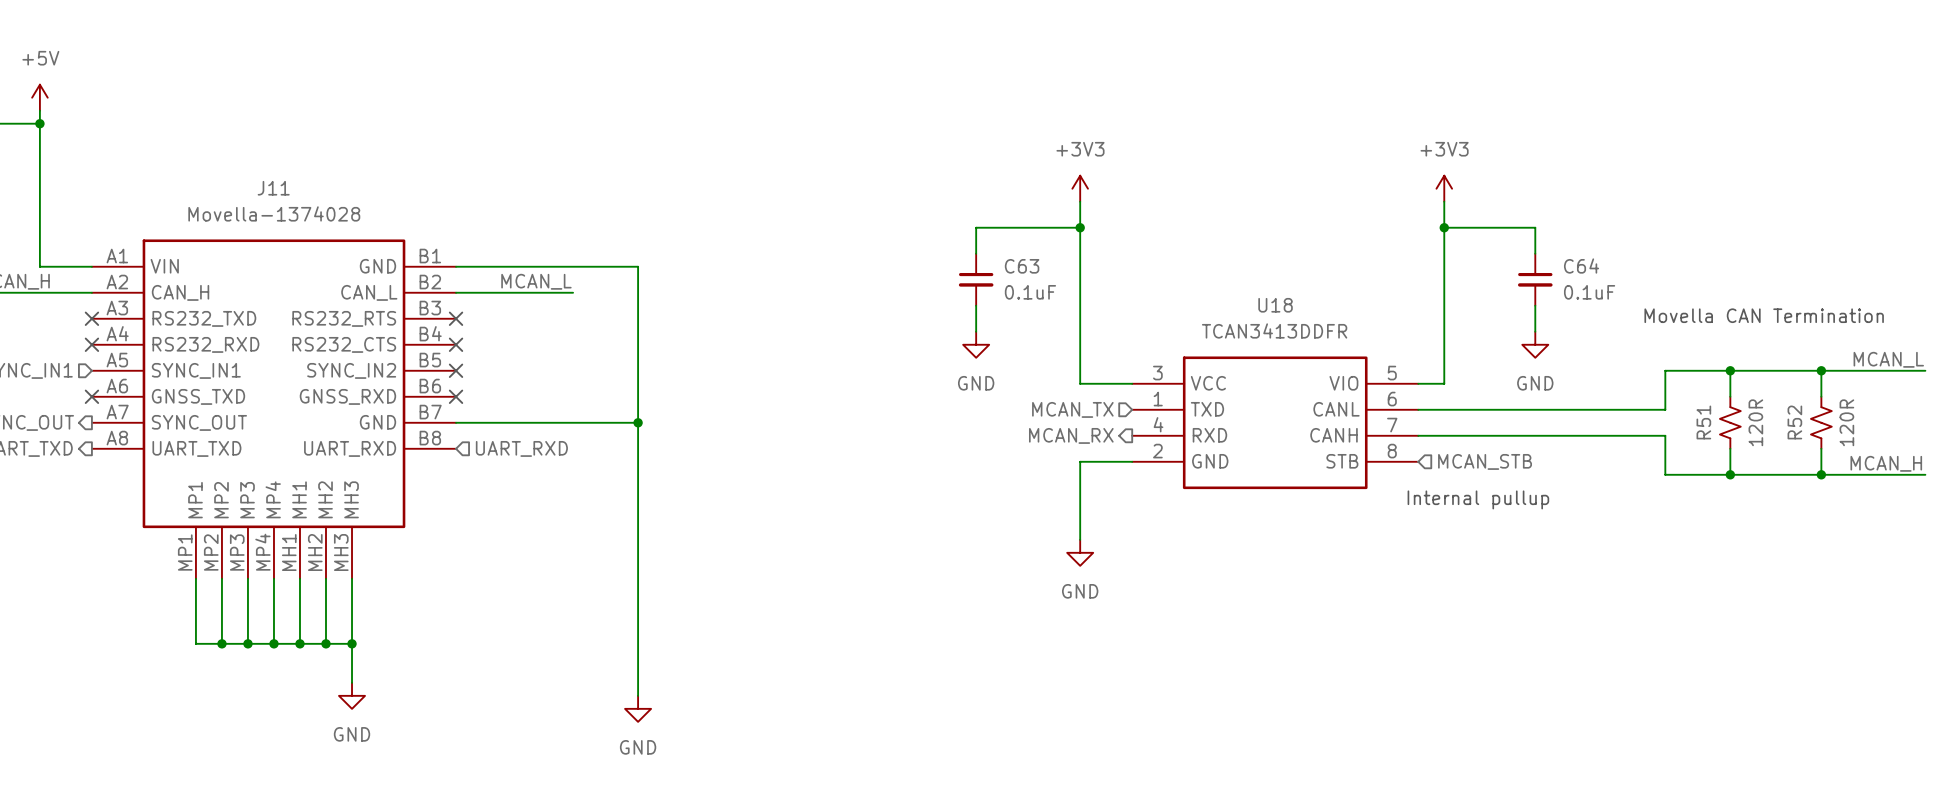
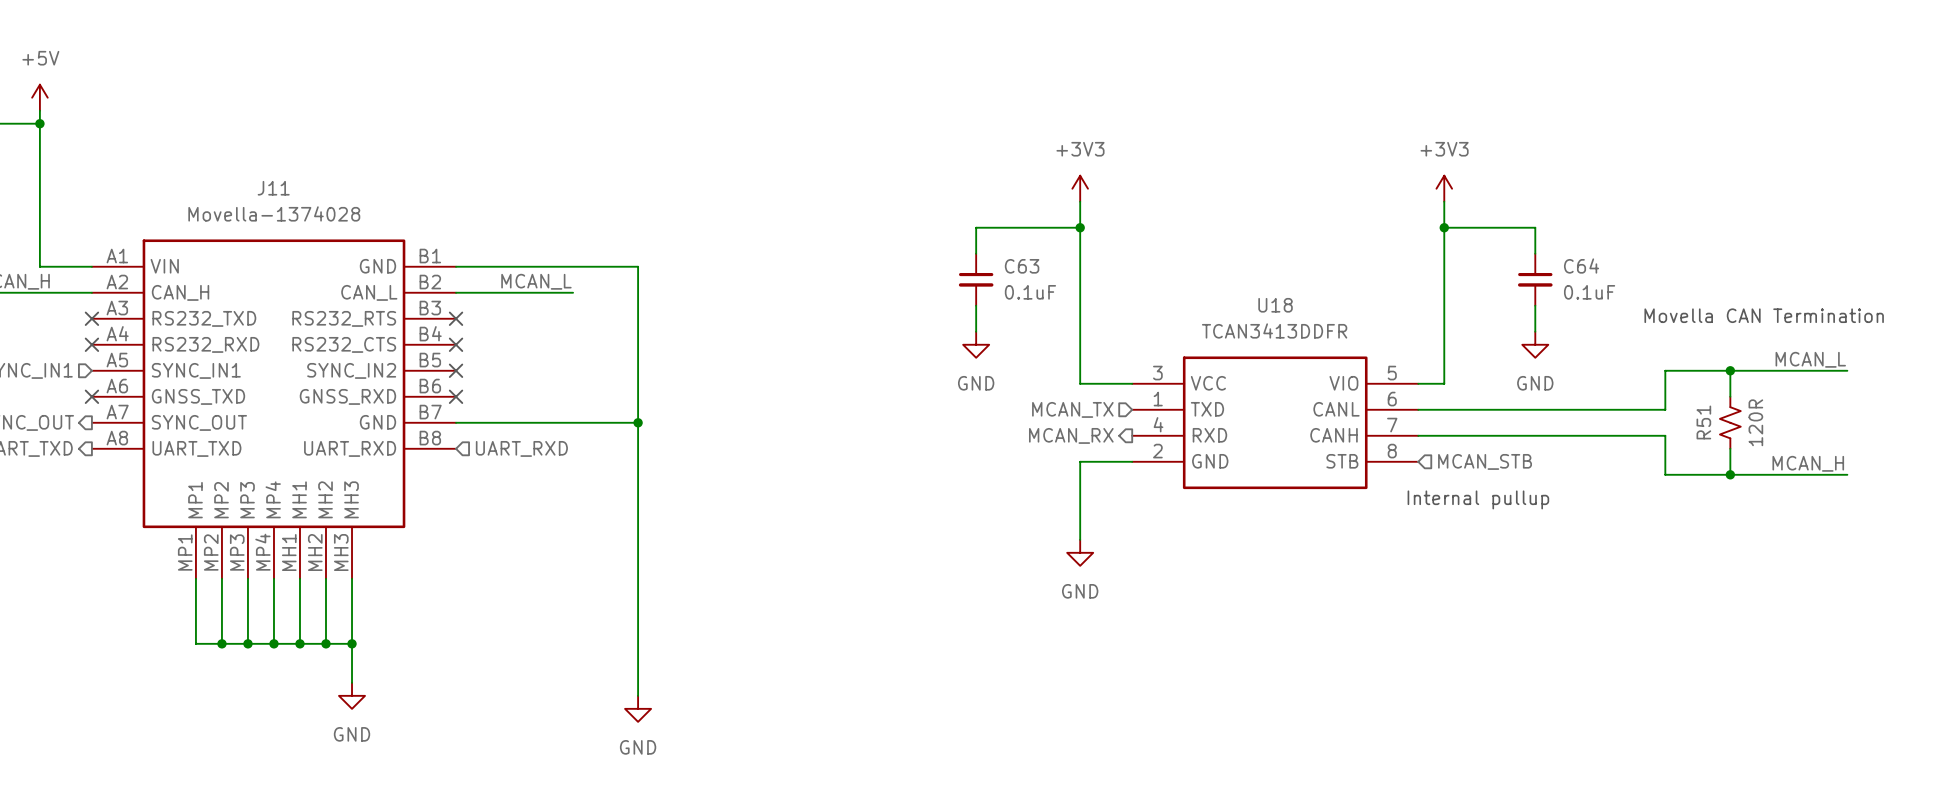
label position: MCAN_L (1888, 359) -> MCAN_L (1810, 359)
wire: (1821, 370) (1821, 396) -> none
junction: (1821, 370) -> none
wire: (1847, 370) (1925, 370) -> none
R52: 120R (1821, 422) -> none
wire: (1821, 448) (1821, 474) -> none
label position: MCAN_H (1886, 463) -> MCAN_H (1808, 463)
junction: (1821, 474) -> none
wire: (1847, 474) (1925, 474) -> none

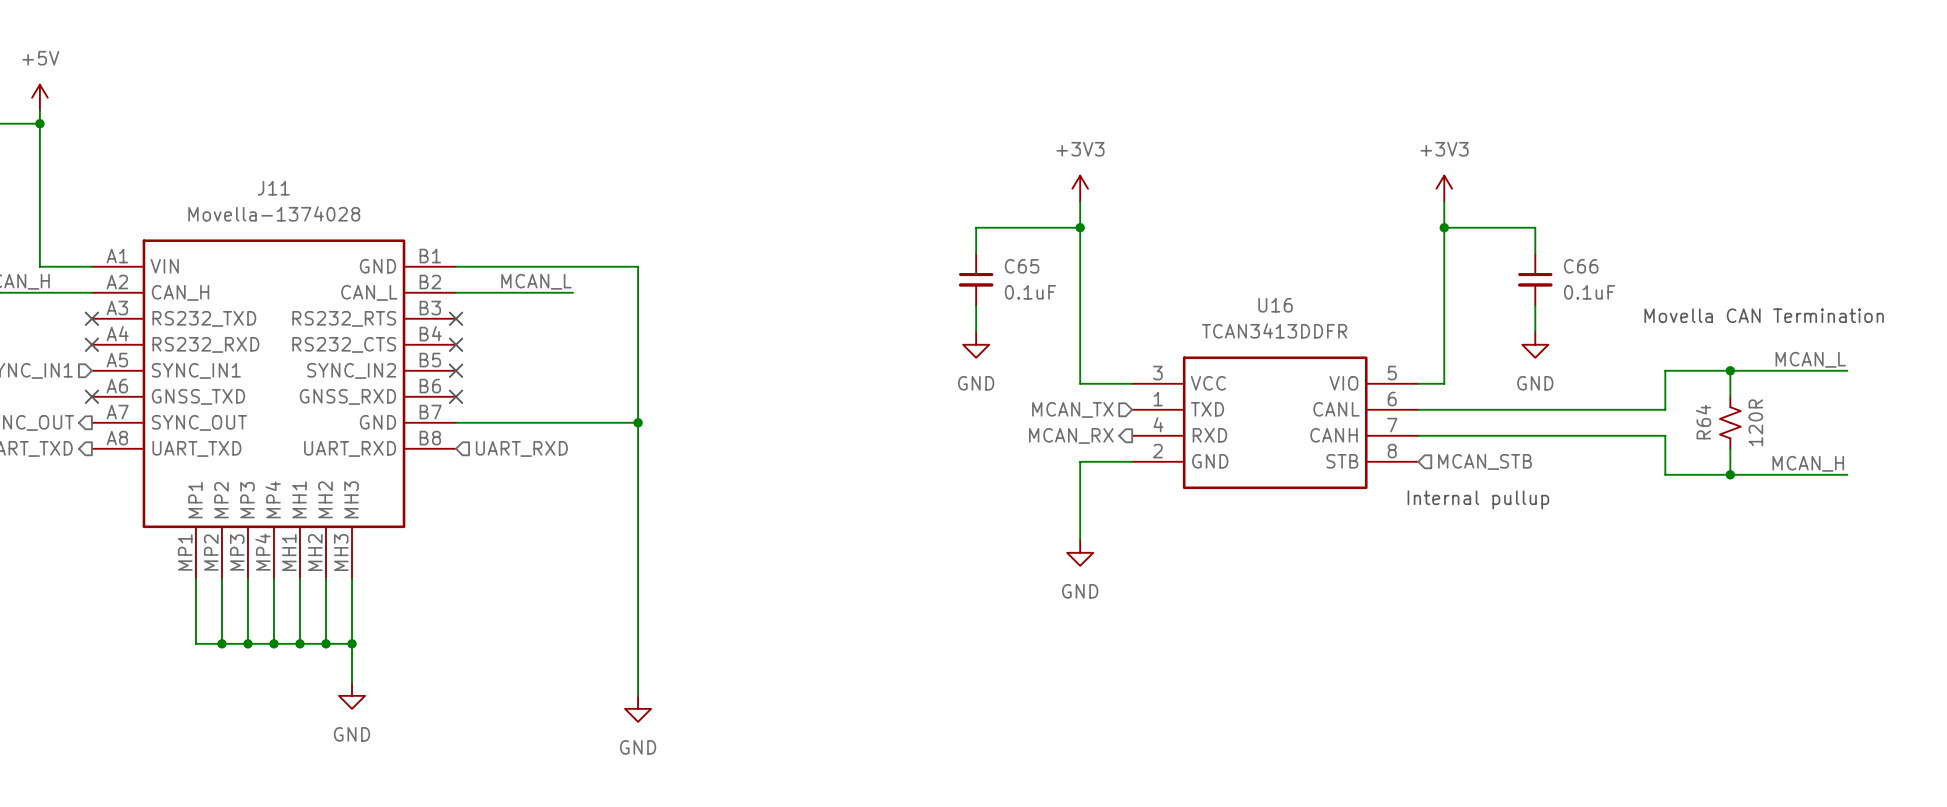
C63 name: C63 (1022, 266) -> C65 (1022, 266)
C64 name: C64 (1581, 266) -> C66 (1581, 266)
U18 name: U18 (1275, 305) -> U16 (1275, 305)
R51 name: R51 (1703, 422) -> R64 (1703, 422)

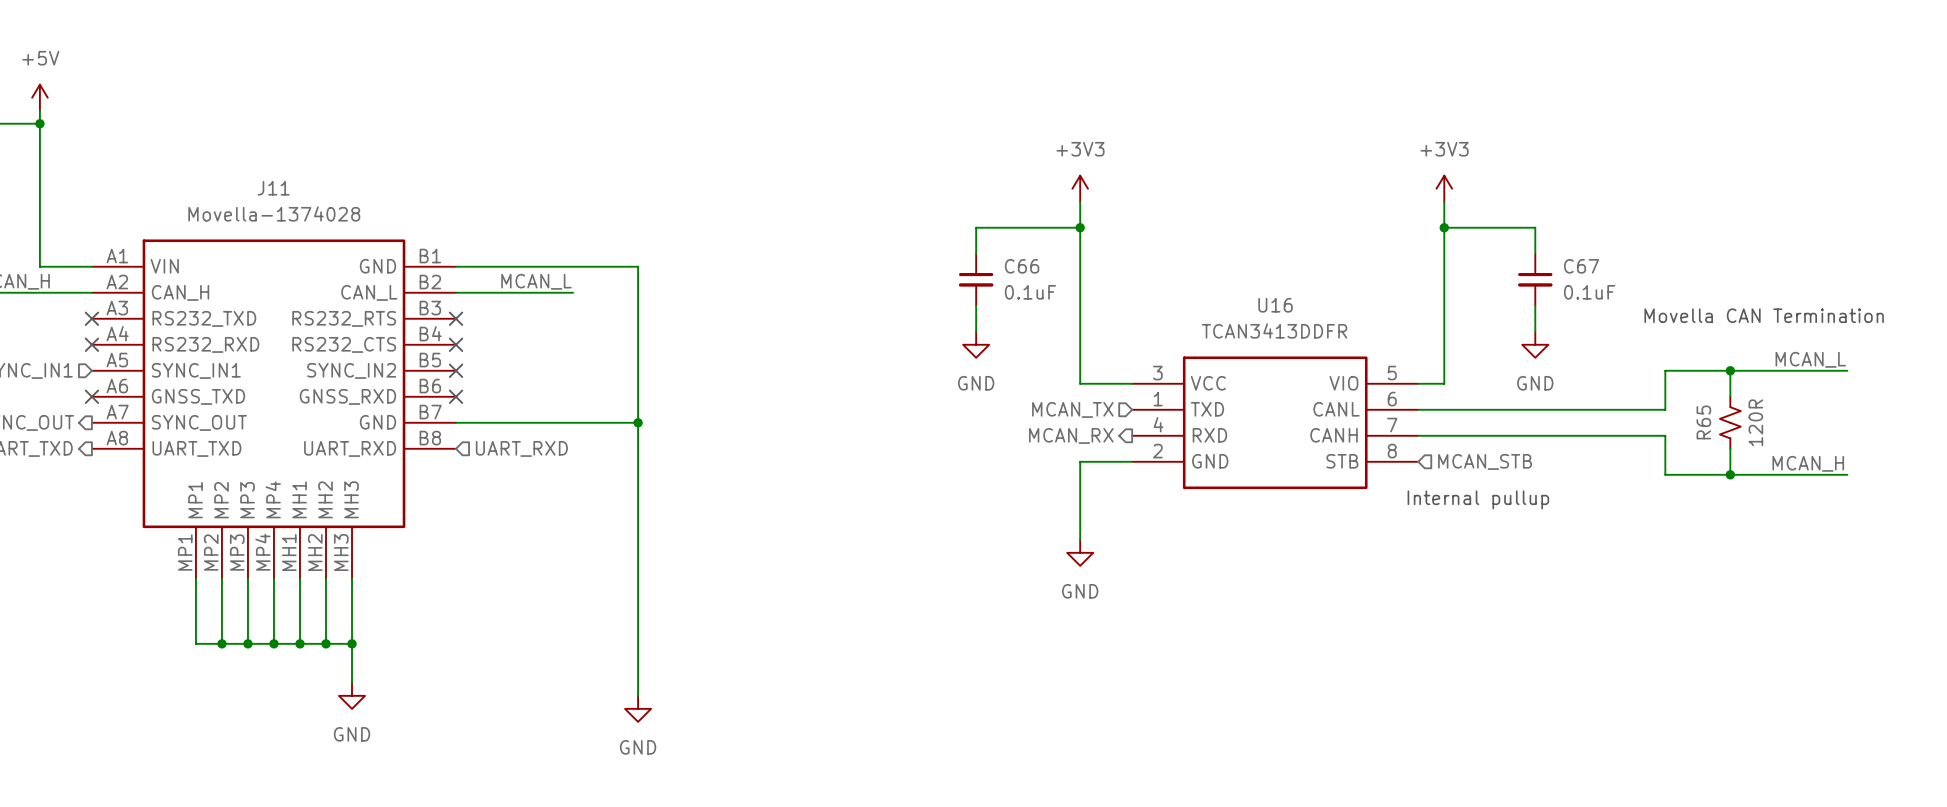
C65 name: C65 (1022, 266) -> C66 (1022, 266)
C66 name: C66 (1581, 266) -> C67 (1581, 266)
R64 name: R64 (1703, 422) -> R65 (1703, 422)

